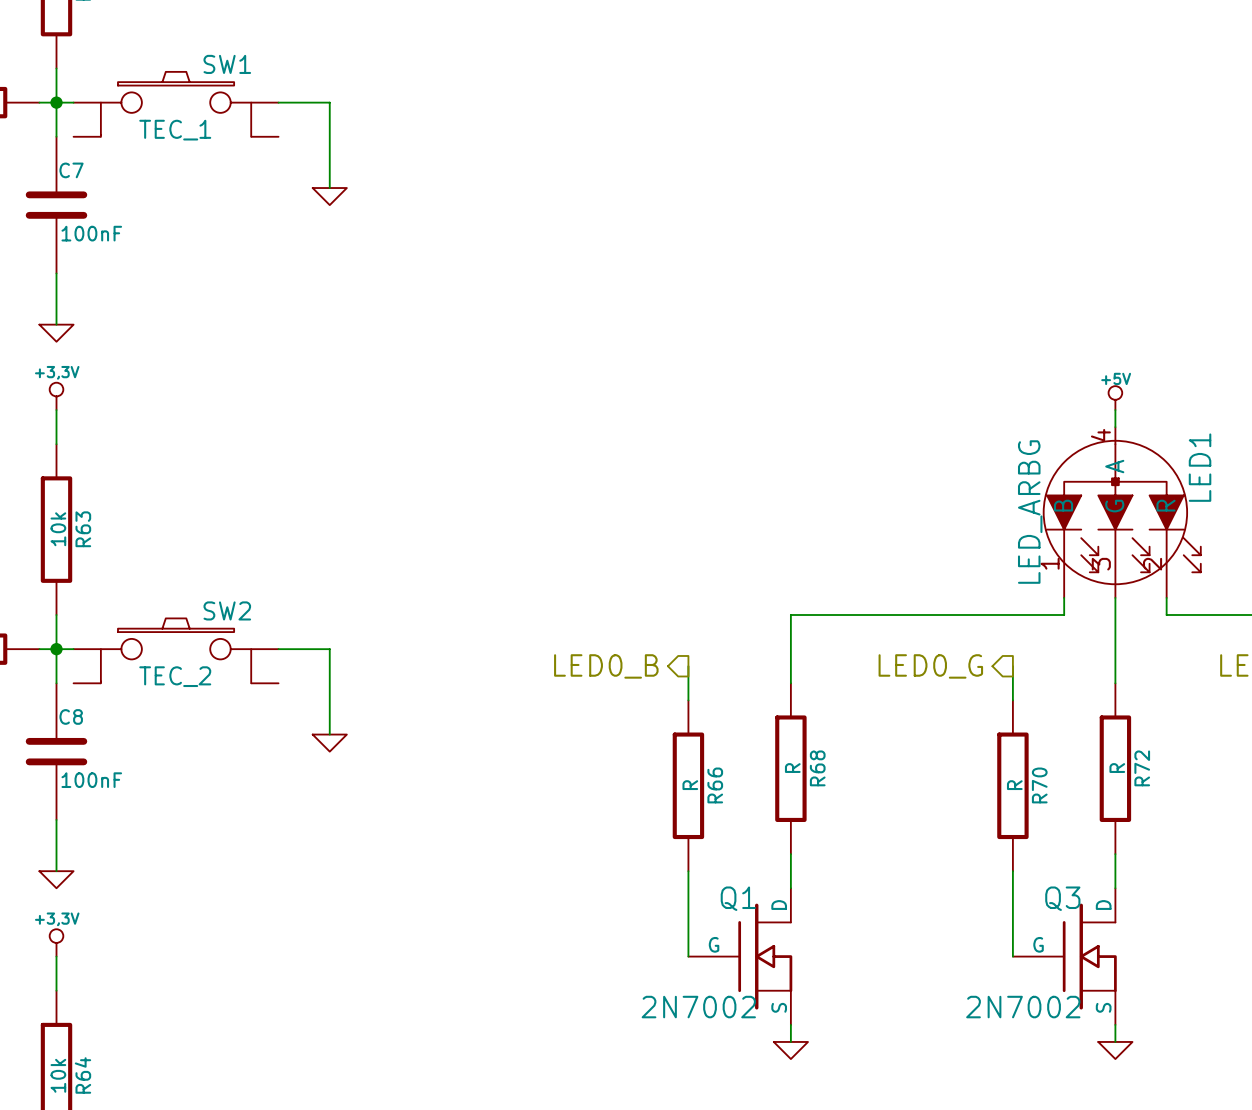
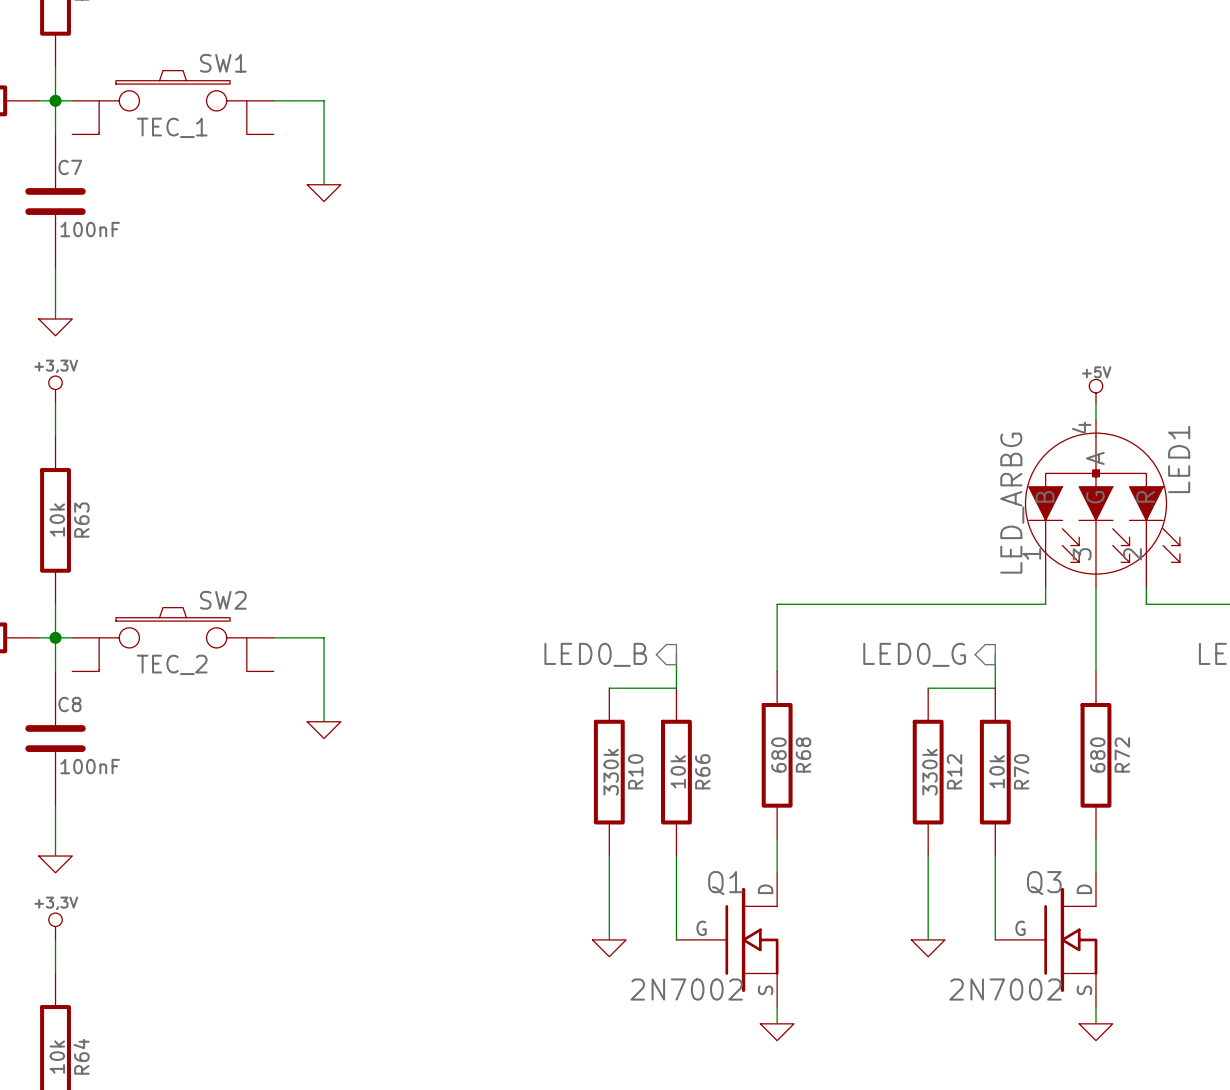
wire: none -> (609, 688) (676, 688)
wire: none -> (928, 688) (995, 688)
R68 value: R (792, 768) -> 680 (778, 754)
R72 value: R (1117, 768) -> 680 (1097, 754)
R10: none -> 330k (609, 772)
R66 value: R (690, 785) -> 10k (678, 771)
R12: none -> 330k (928, 772)
R70 value: R (1014, 785) -> 10k (997, 771)
wire: none -> (609, 856) (609, 939)
wire: none -> (928, 856) (928, 939)
power symbol: none -> (609, 948)
power symbol: none -> (928, 948)

